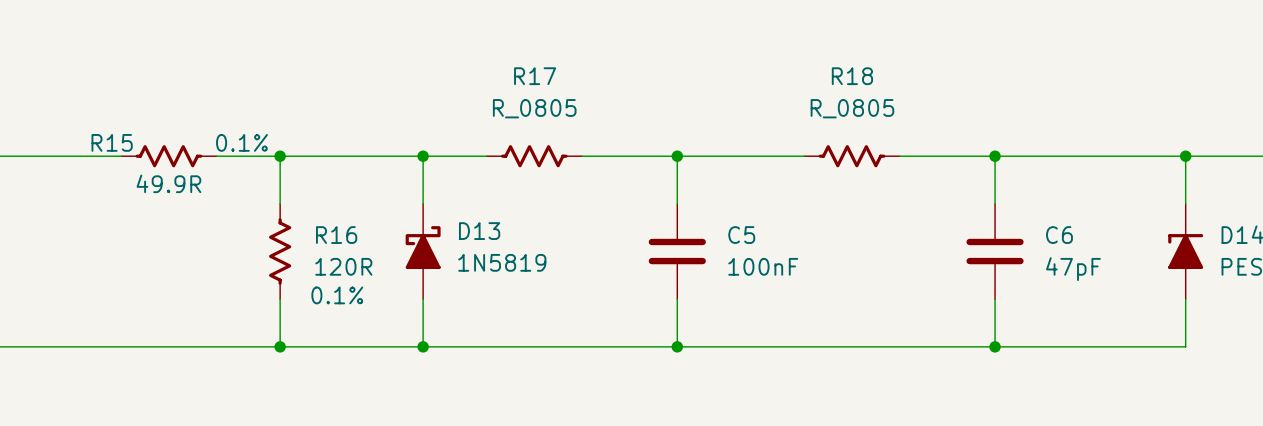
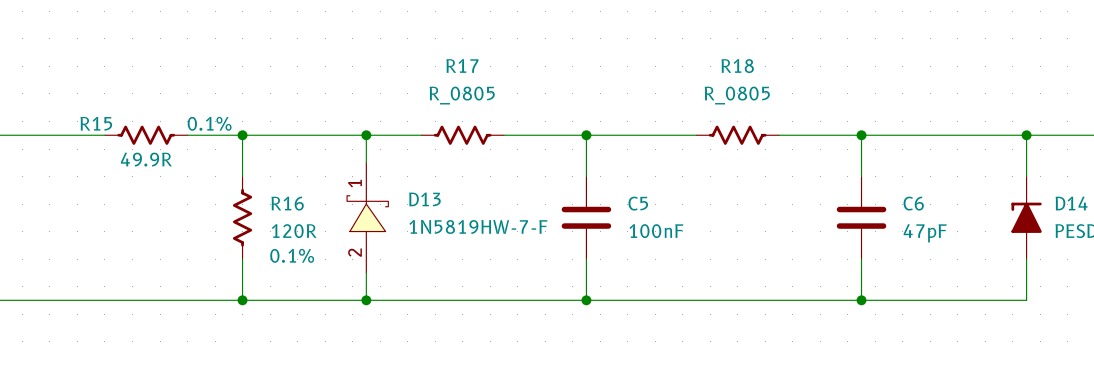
D13 symbol: [405, 203, 441, 300] -> [347, 162, 389, 273]
D13 value: 1N5819 (502, 262) -> 1N5819HW-7-F (478, 226)

